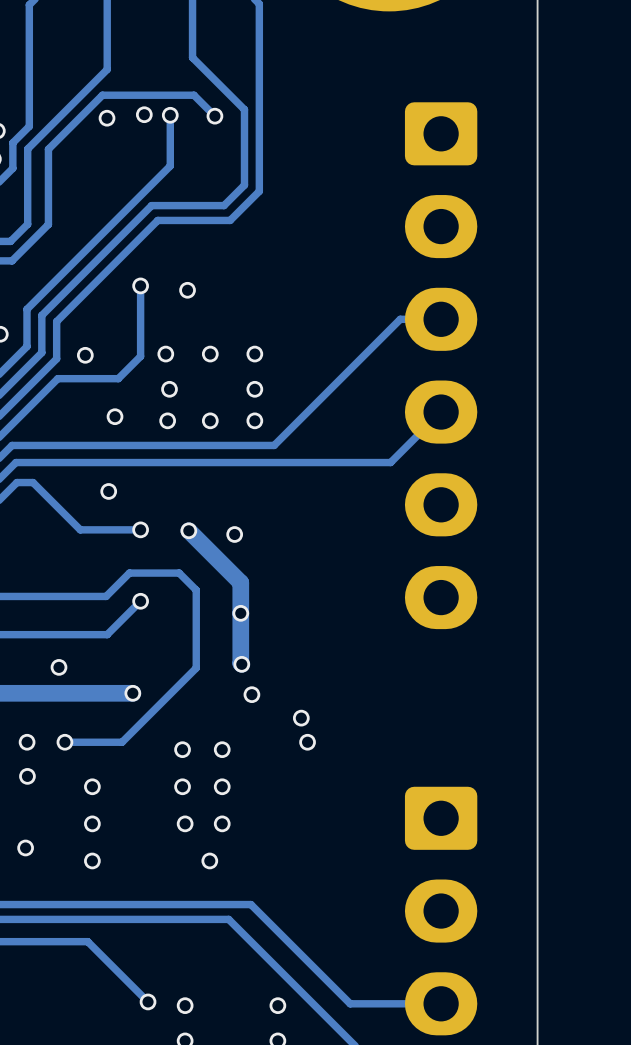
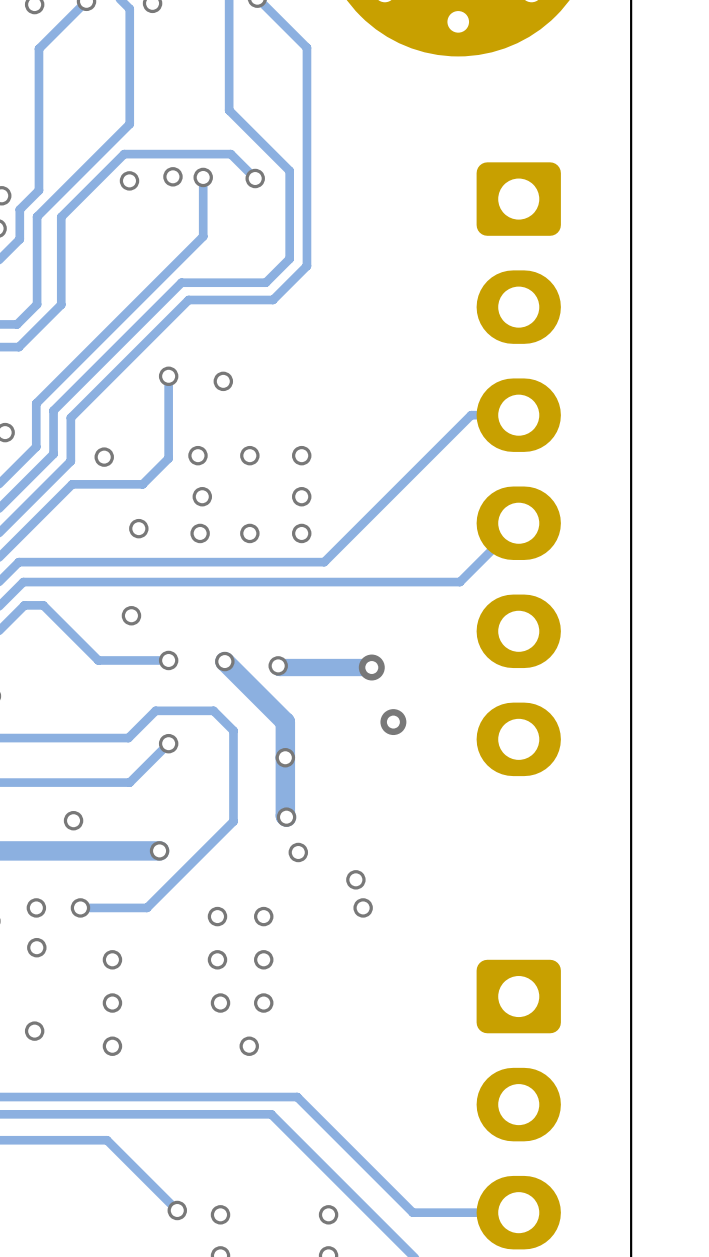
track: none -> (278, 665) (279, 667) (371, 667)
via: none -> (371, 667)
via: none -> (393, 722)

